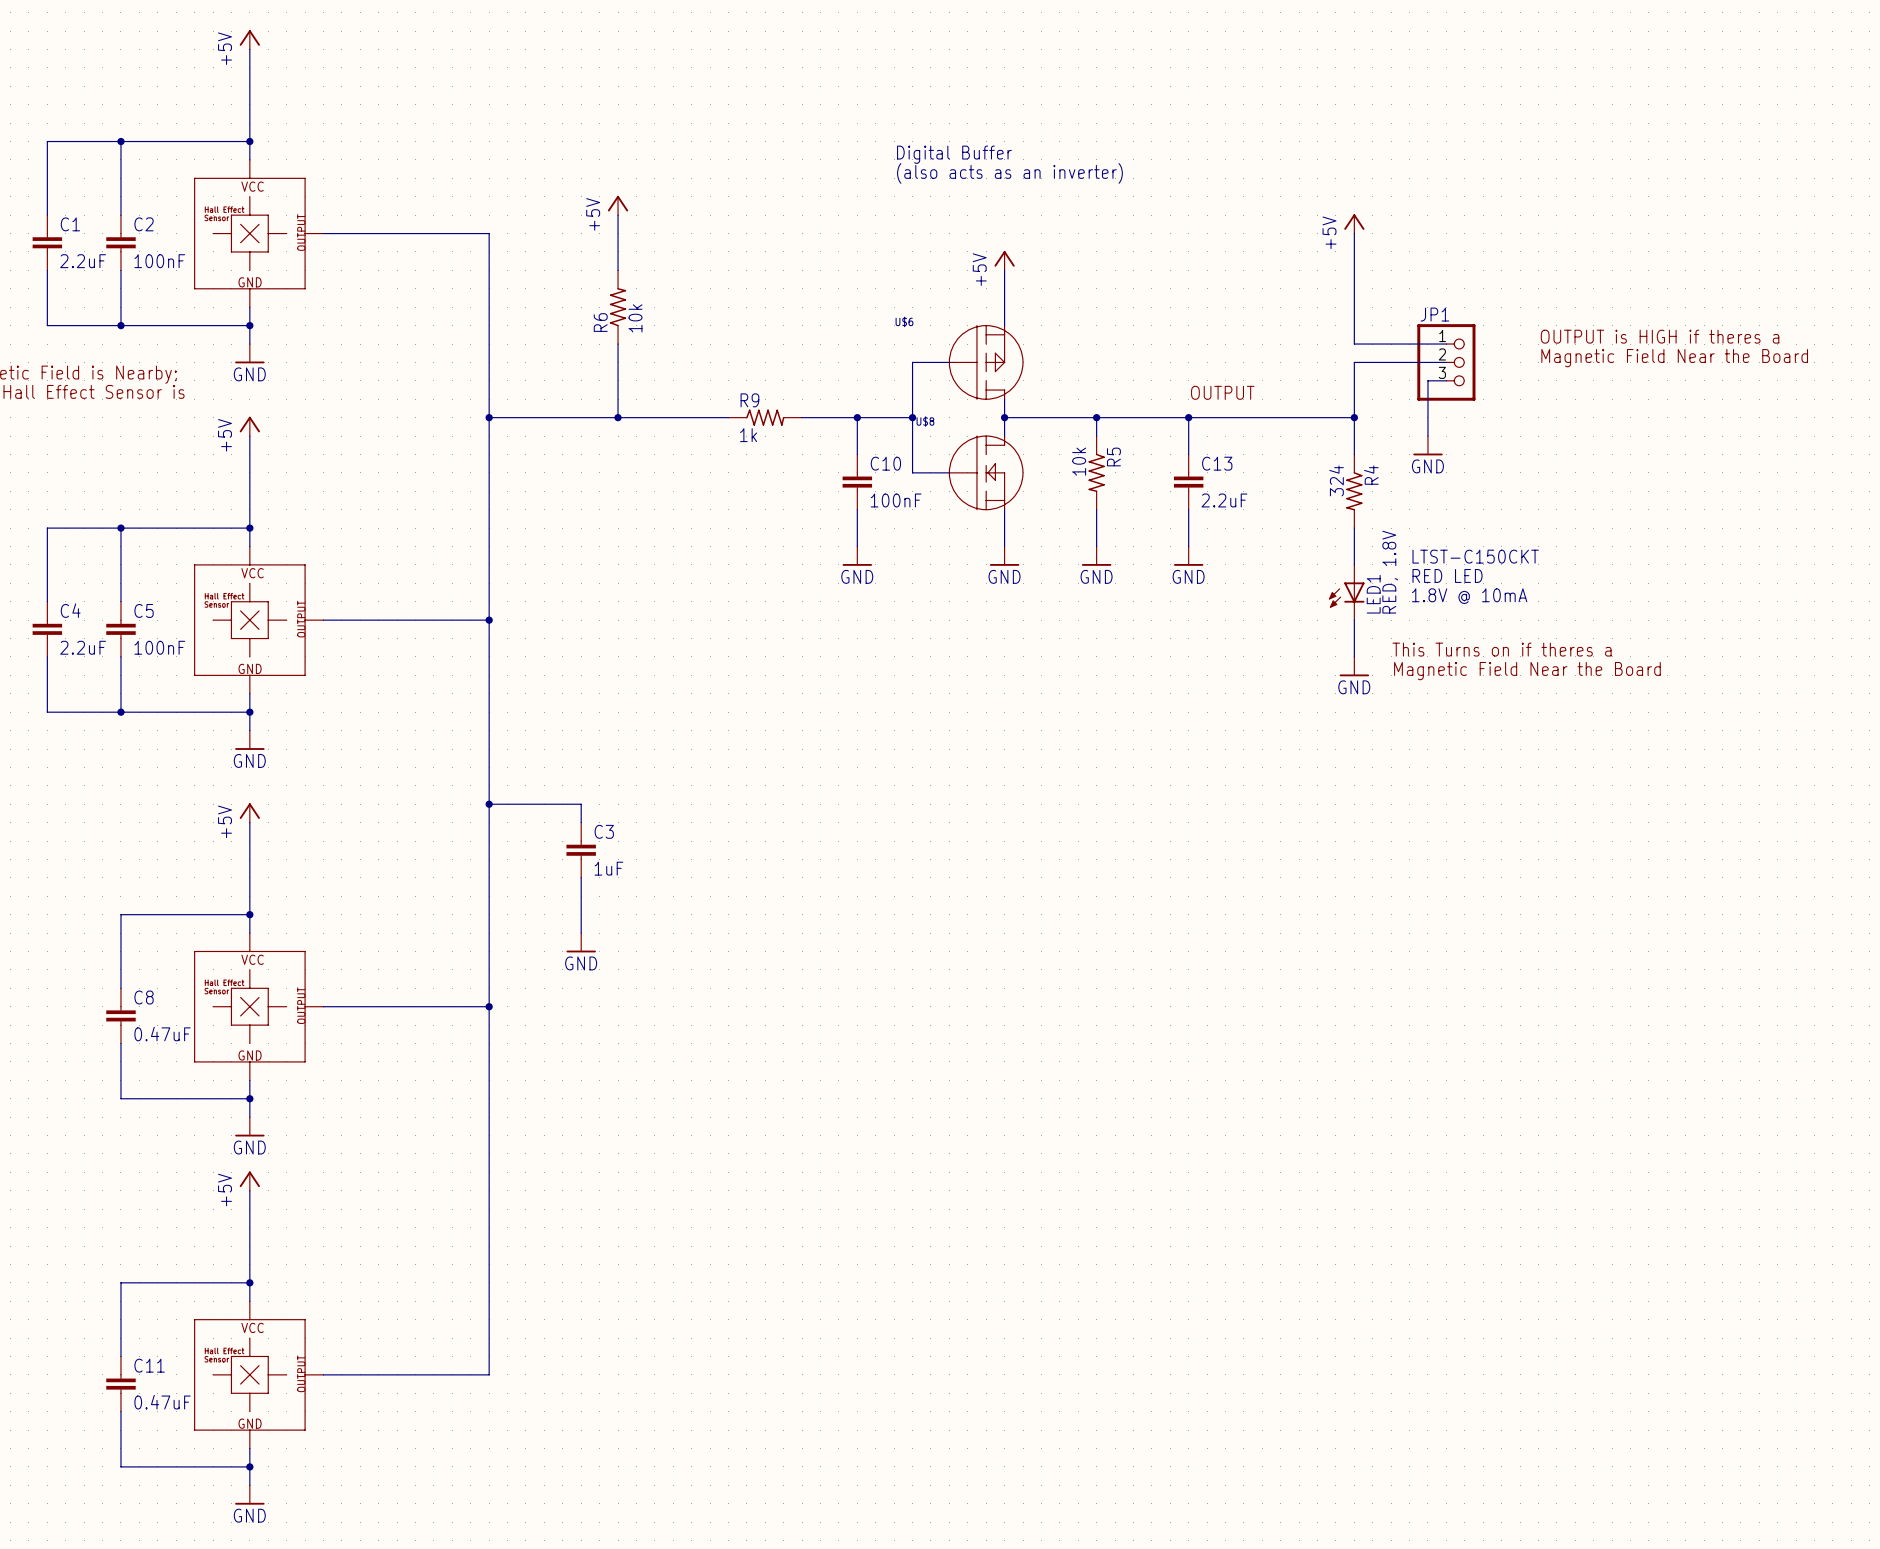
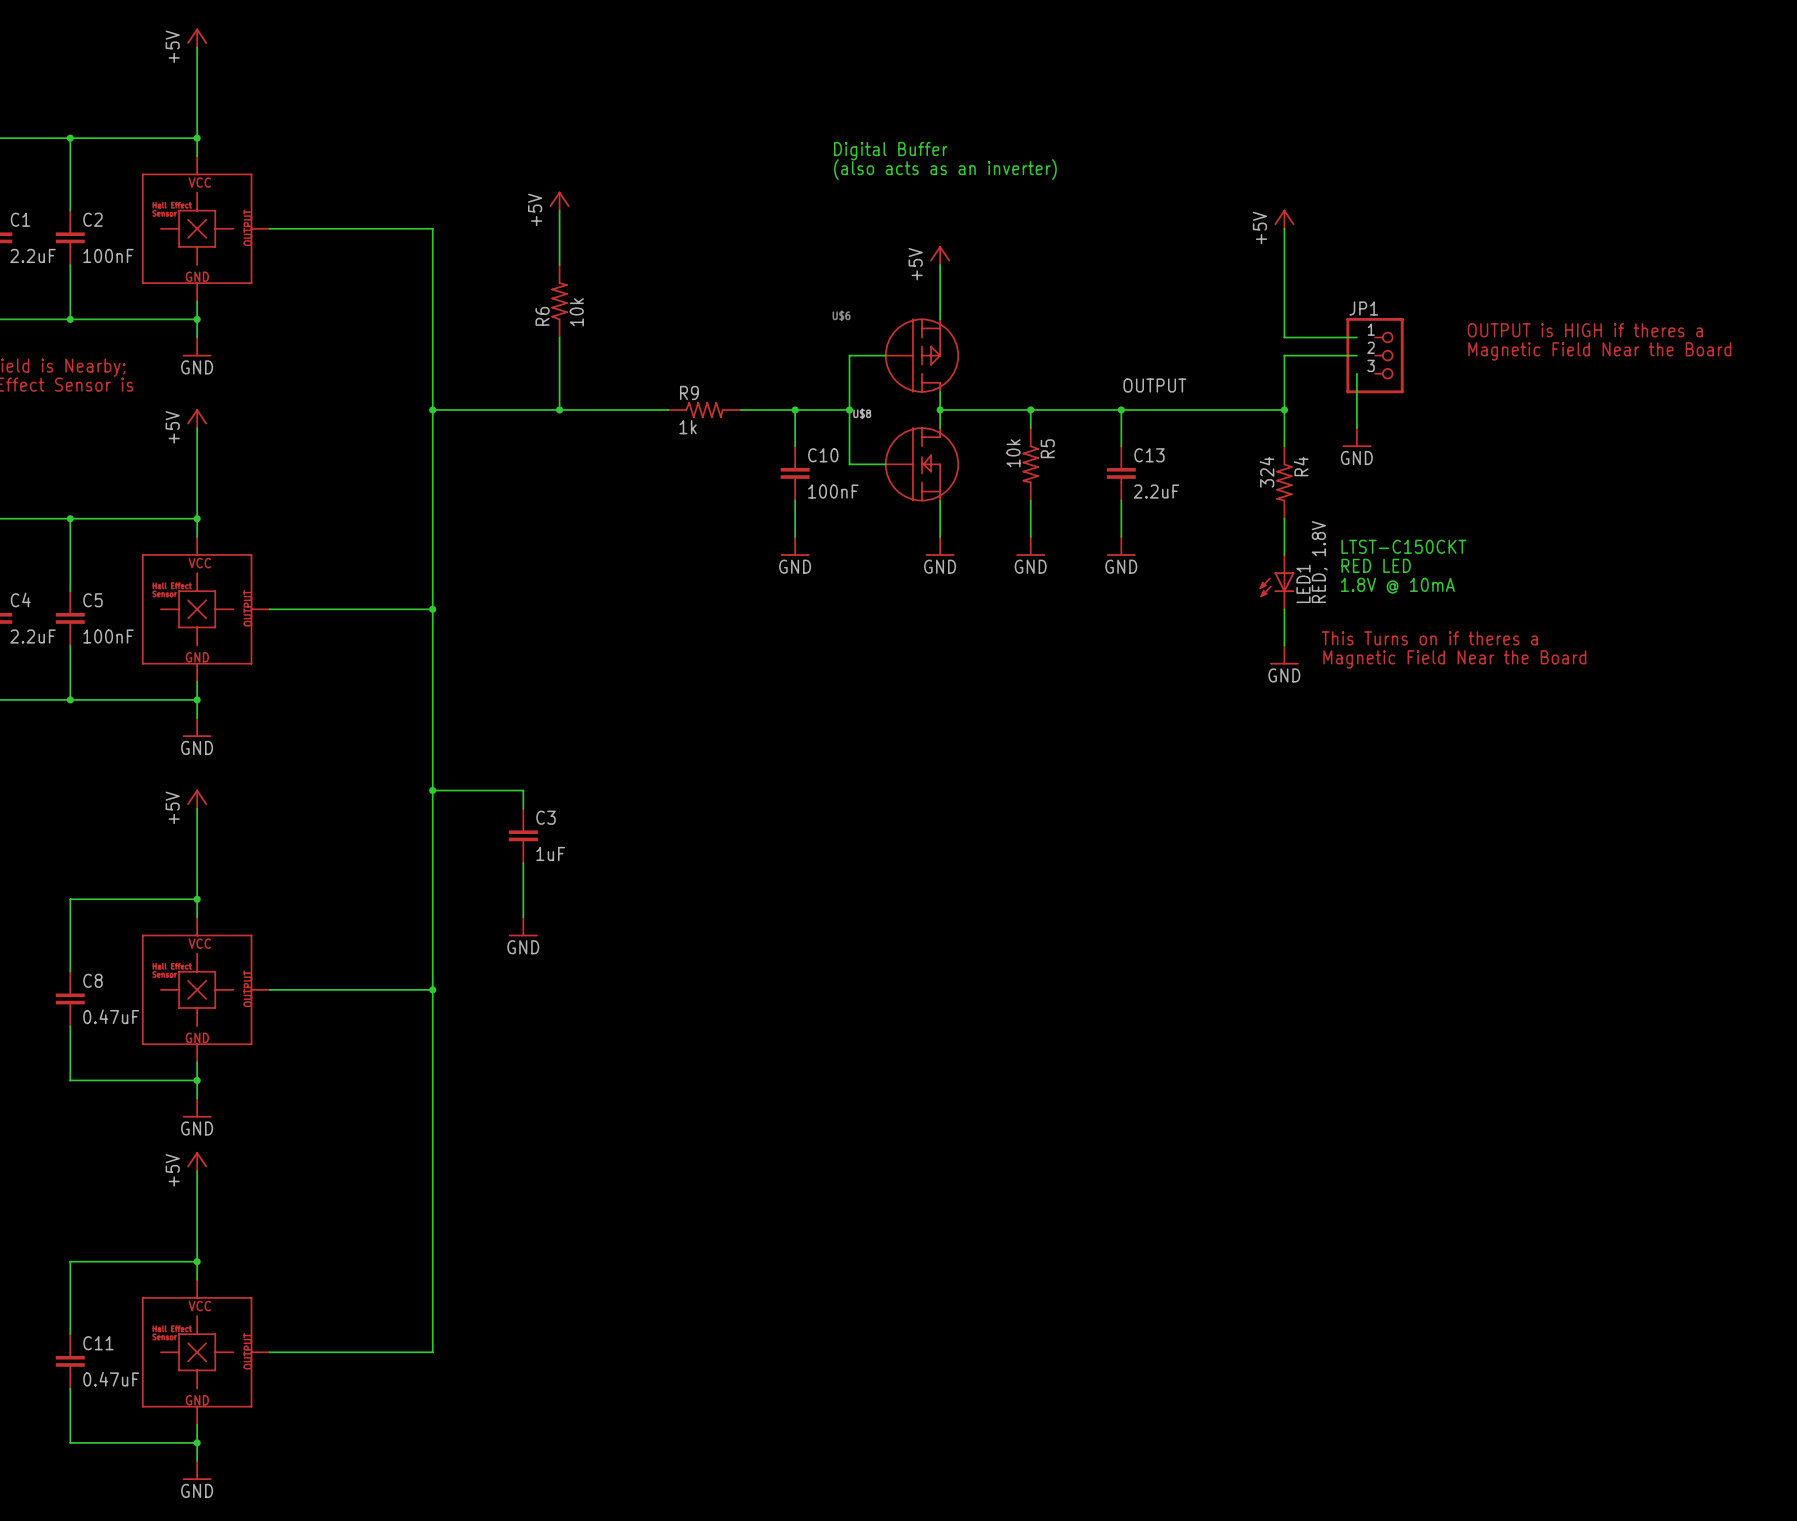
wire: (1427, 344) (1446, 344) -> none
wire: (1427, 362) (1446, 362) -> none
wire: (1427, 380) (1446, 380) -> none

